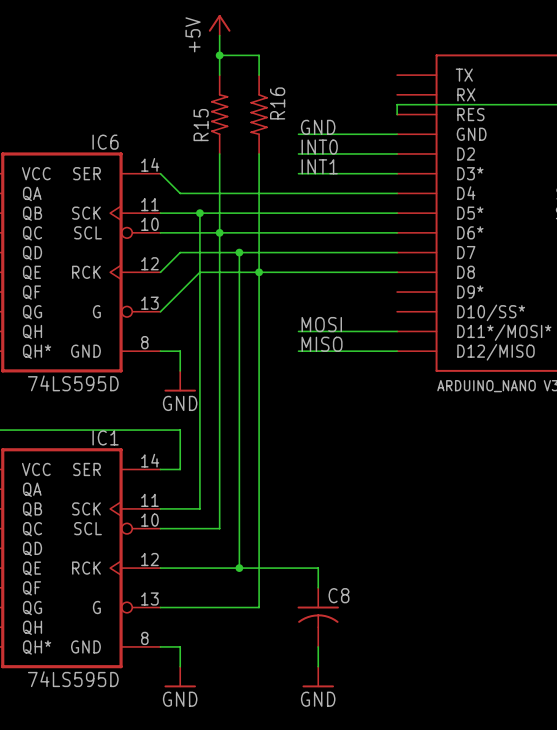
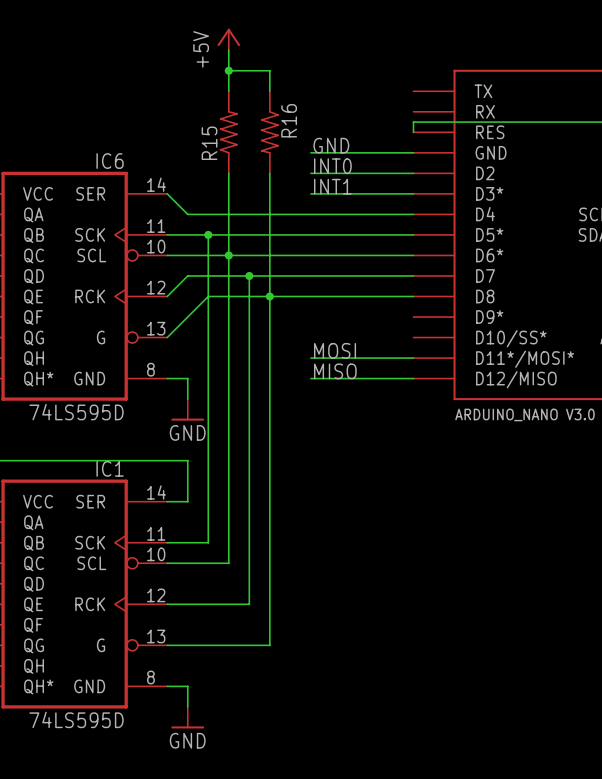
wire: (239, 568) (318, 568) (318, 587) -> none
junction: (239, 568) -> none
C8: (318, 617) -> none
wire: (318, 646) (318, 666) -> none
power symbol: GND (318, 677) -> none

